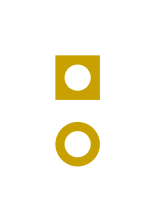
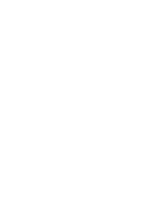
part: (77, 110) -> none

